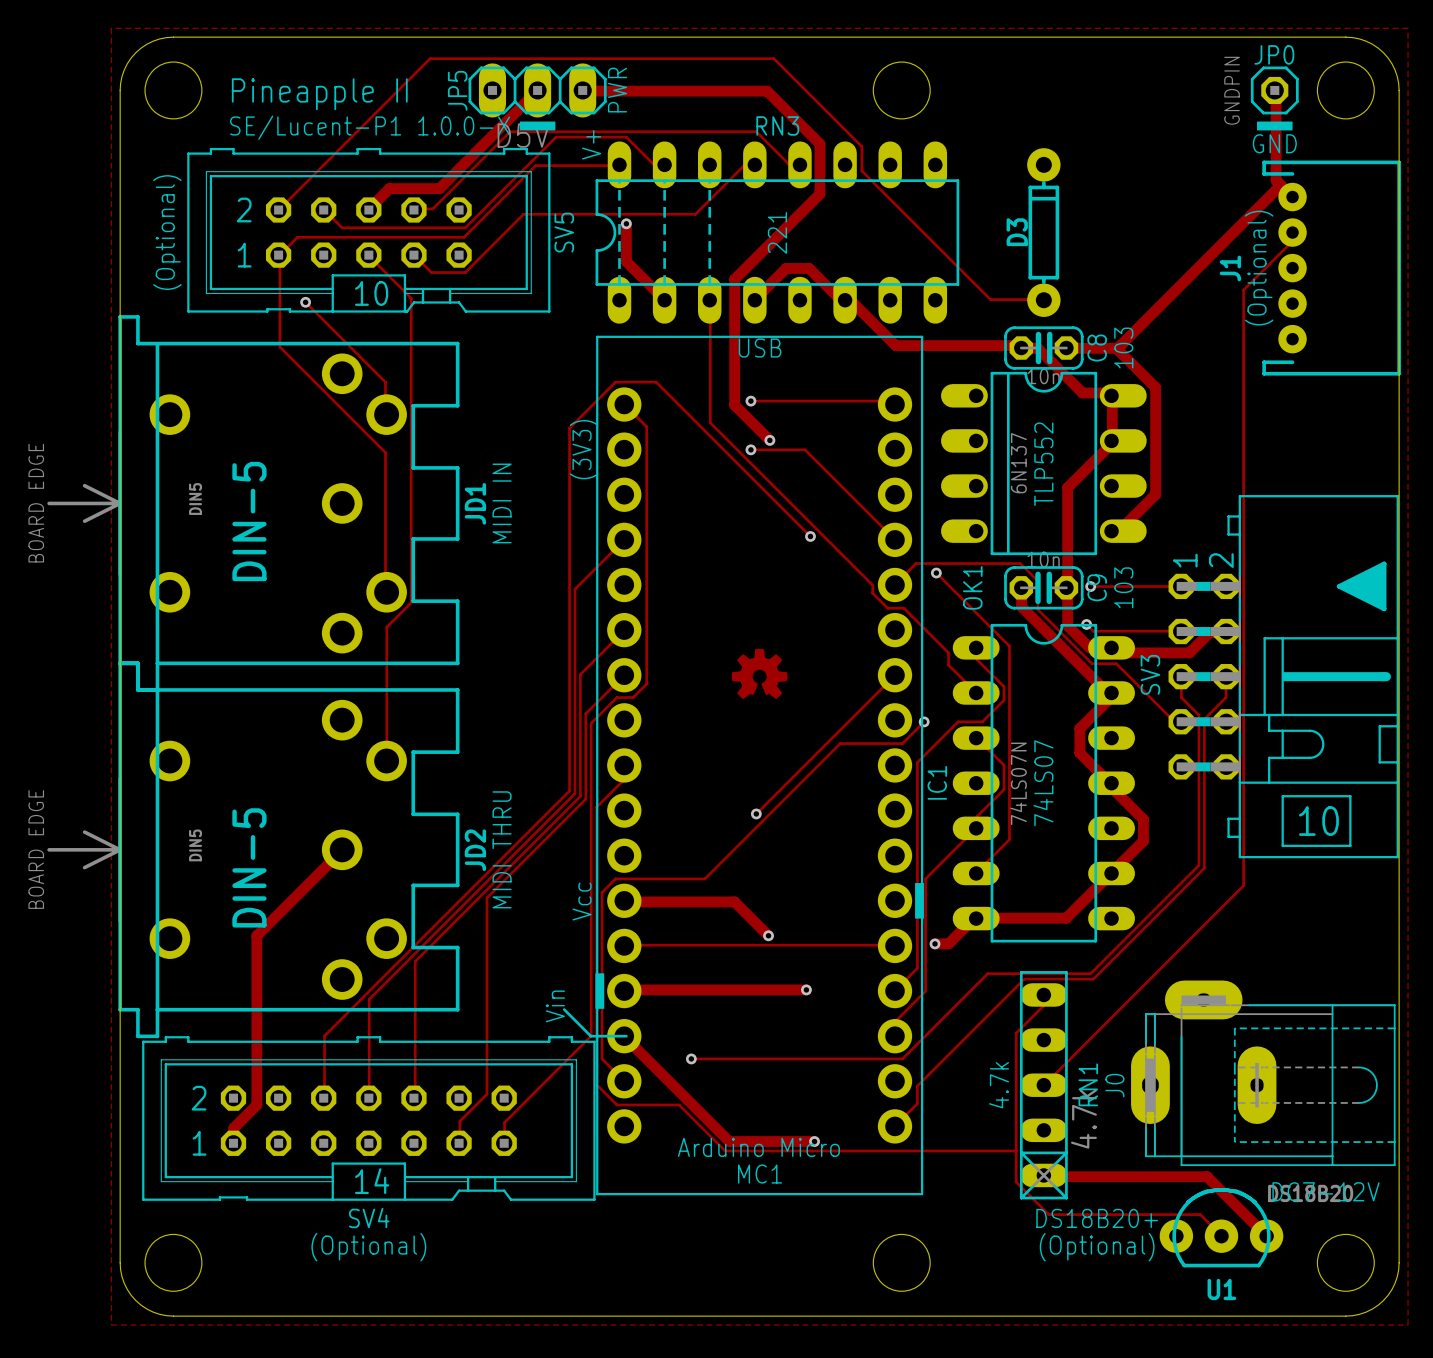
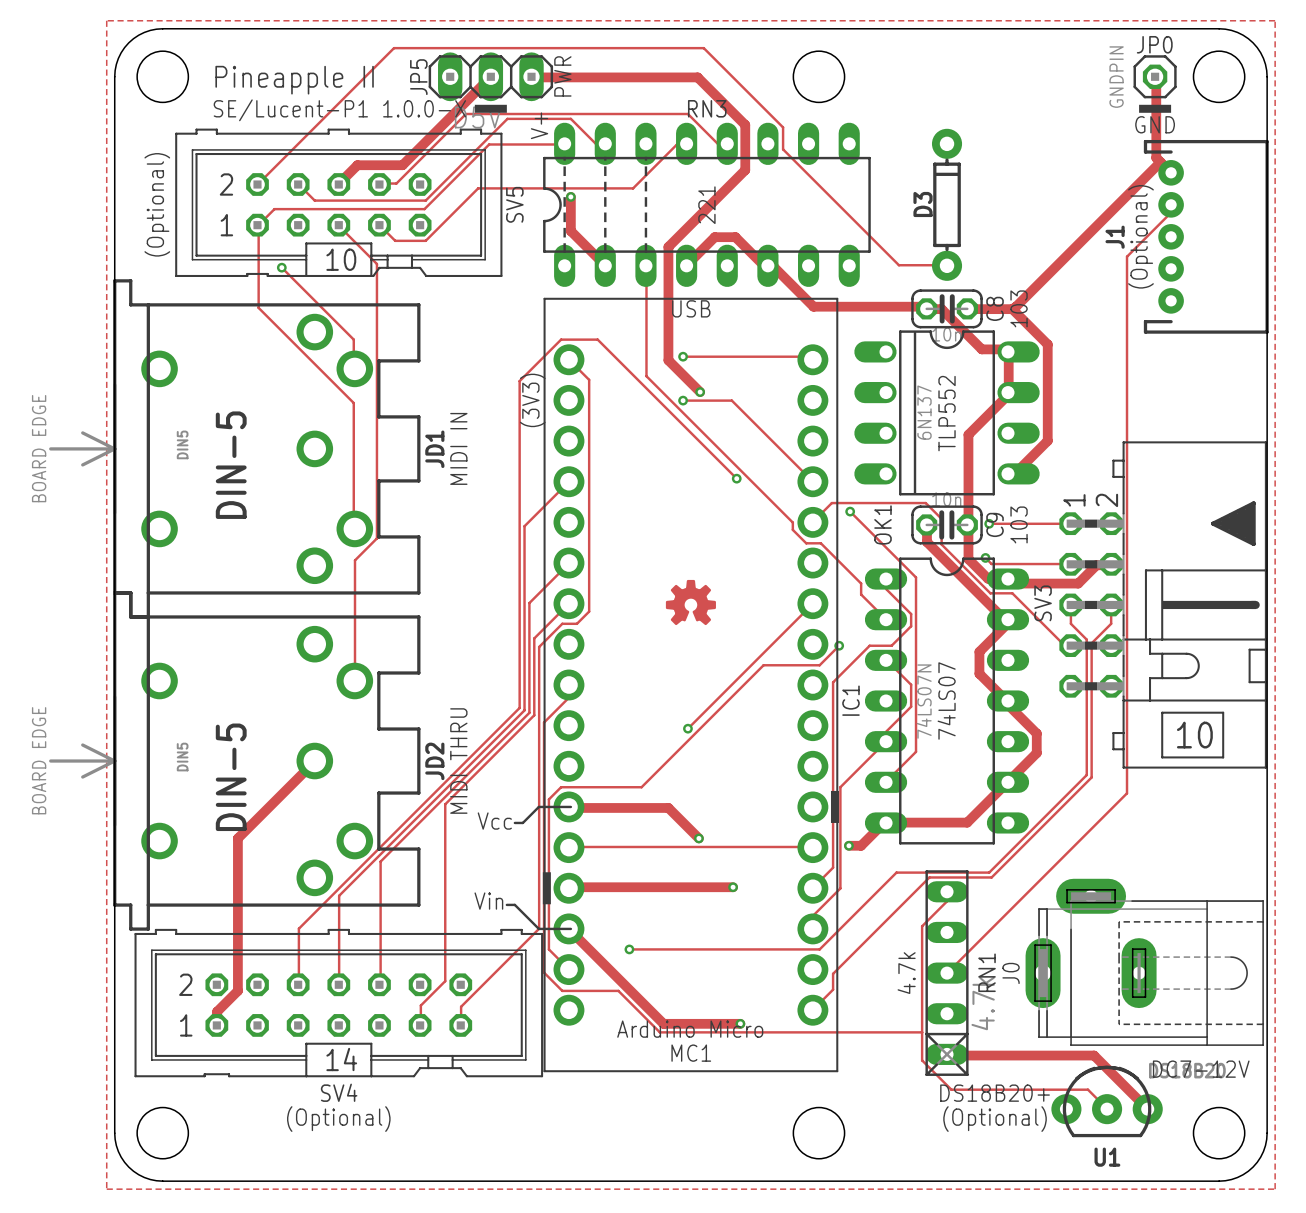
line: none -> (570, 806) (538, 806) (522, 822) (514, 822)
text rotation: 0° (582, 901) -> 90° clockwise (494, 821)
text rotation: 0° (555, 1006) -> 90° clockwise (488, 901)
line: none -> (506, 904) (514, 904)

